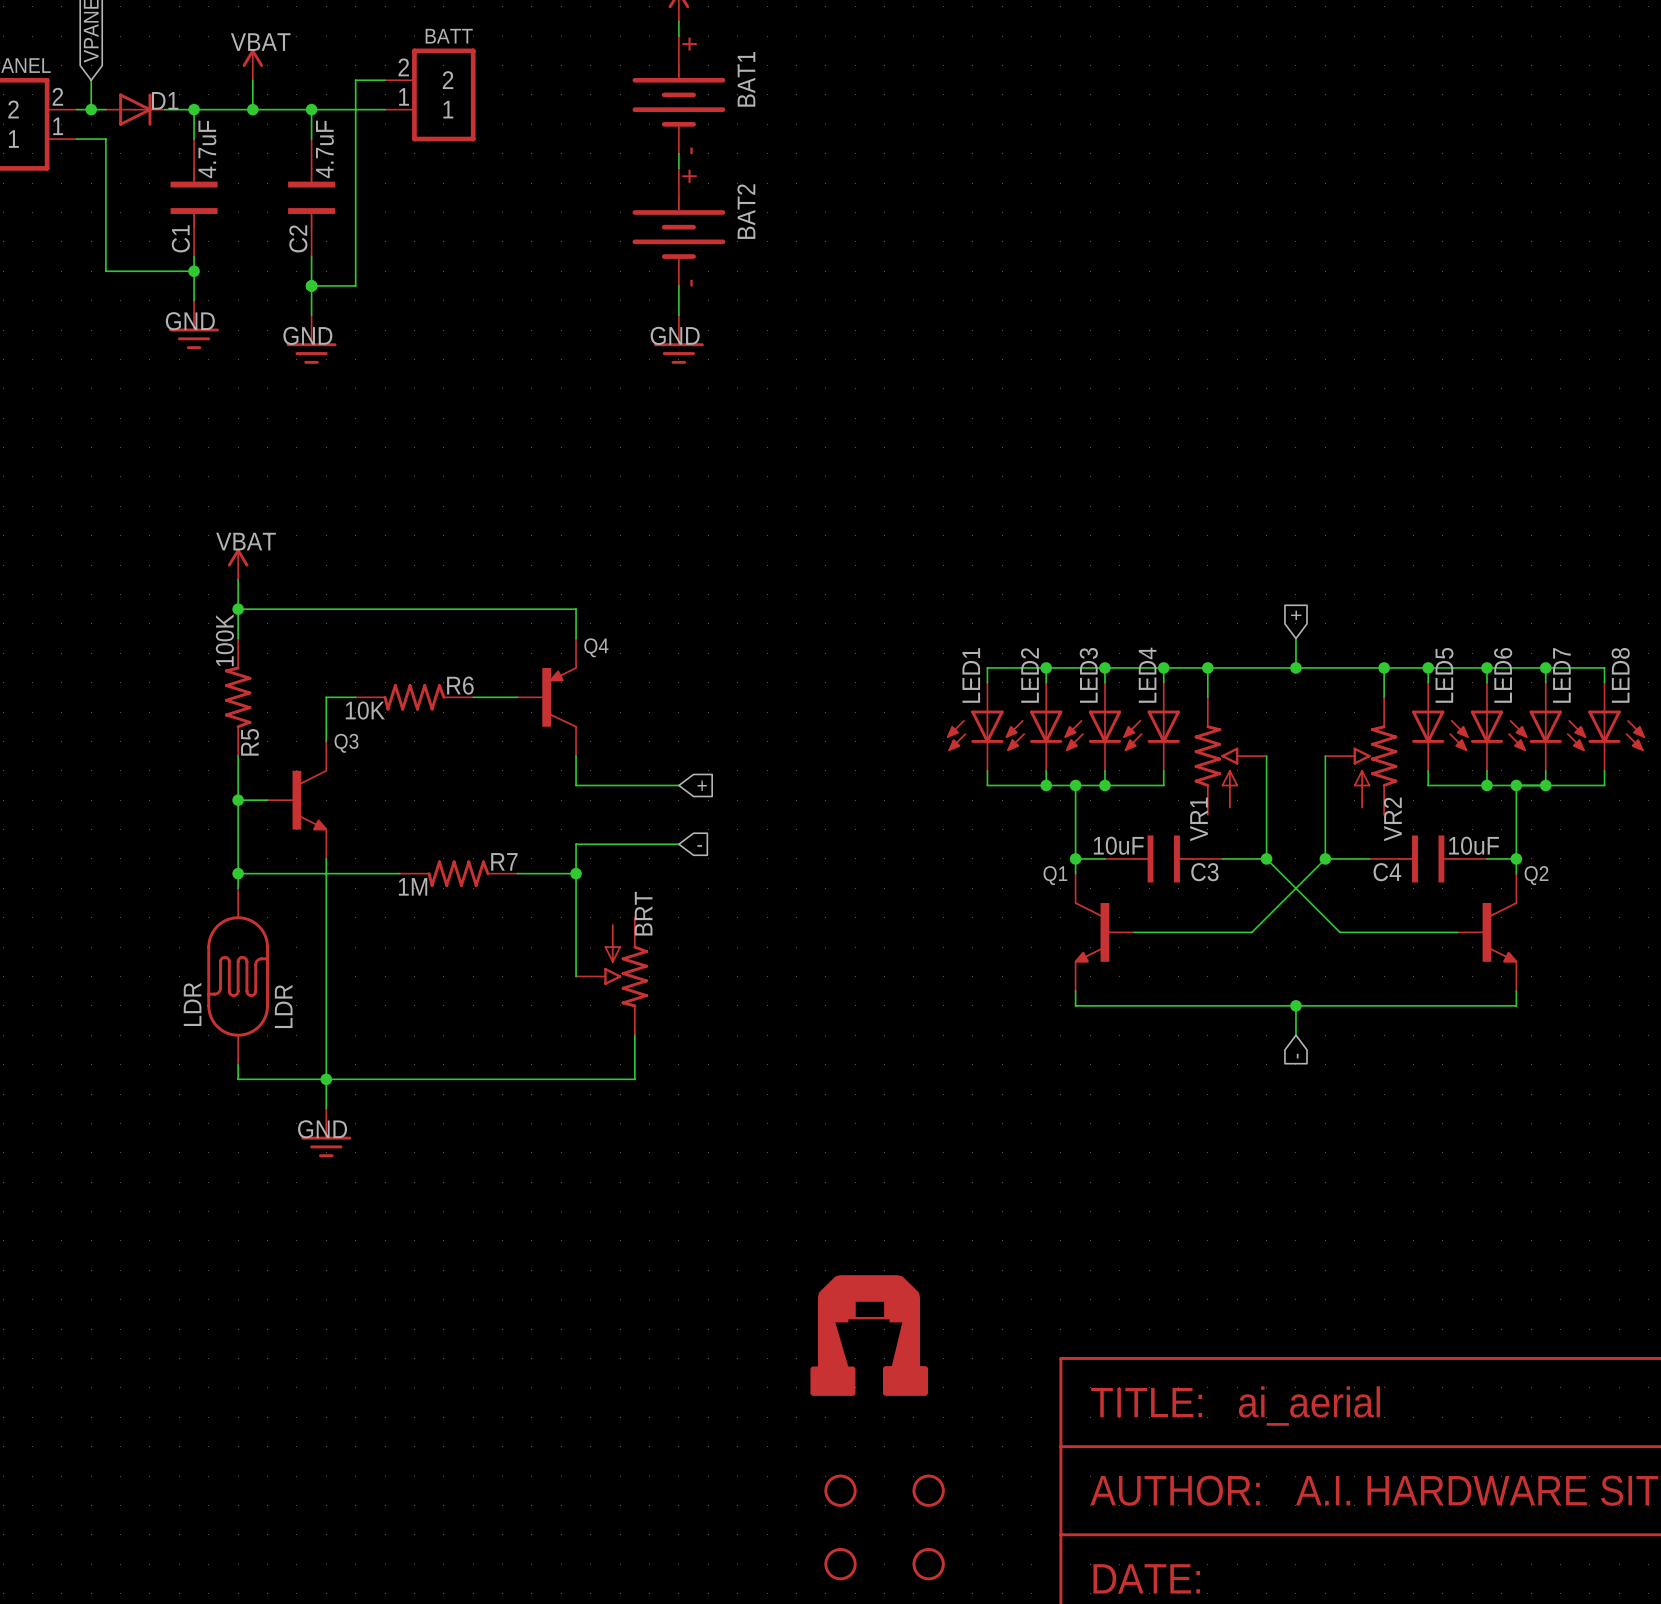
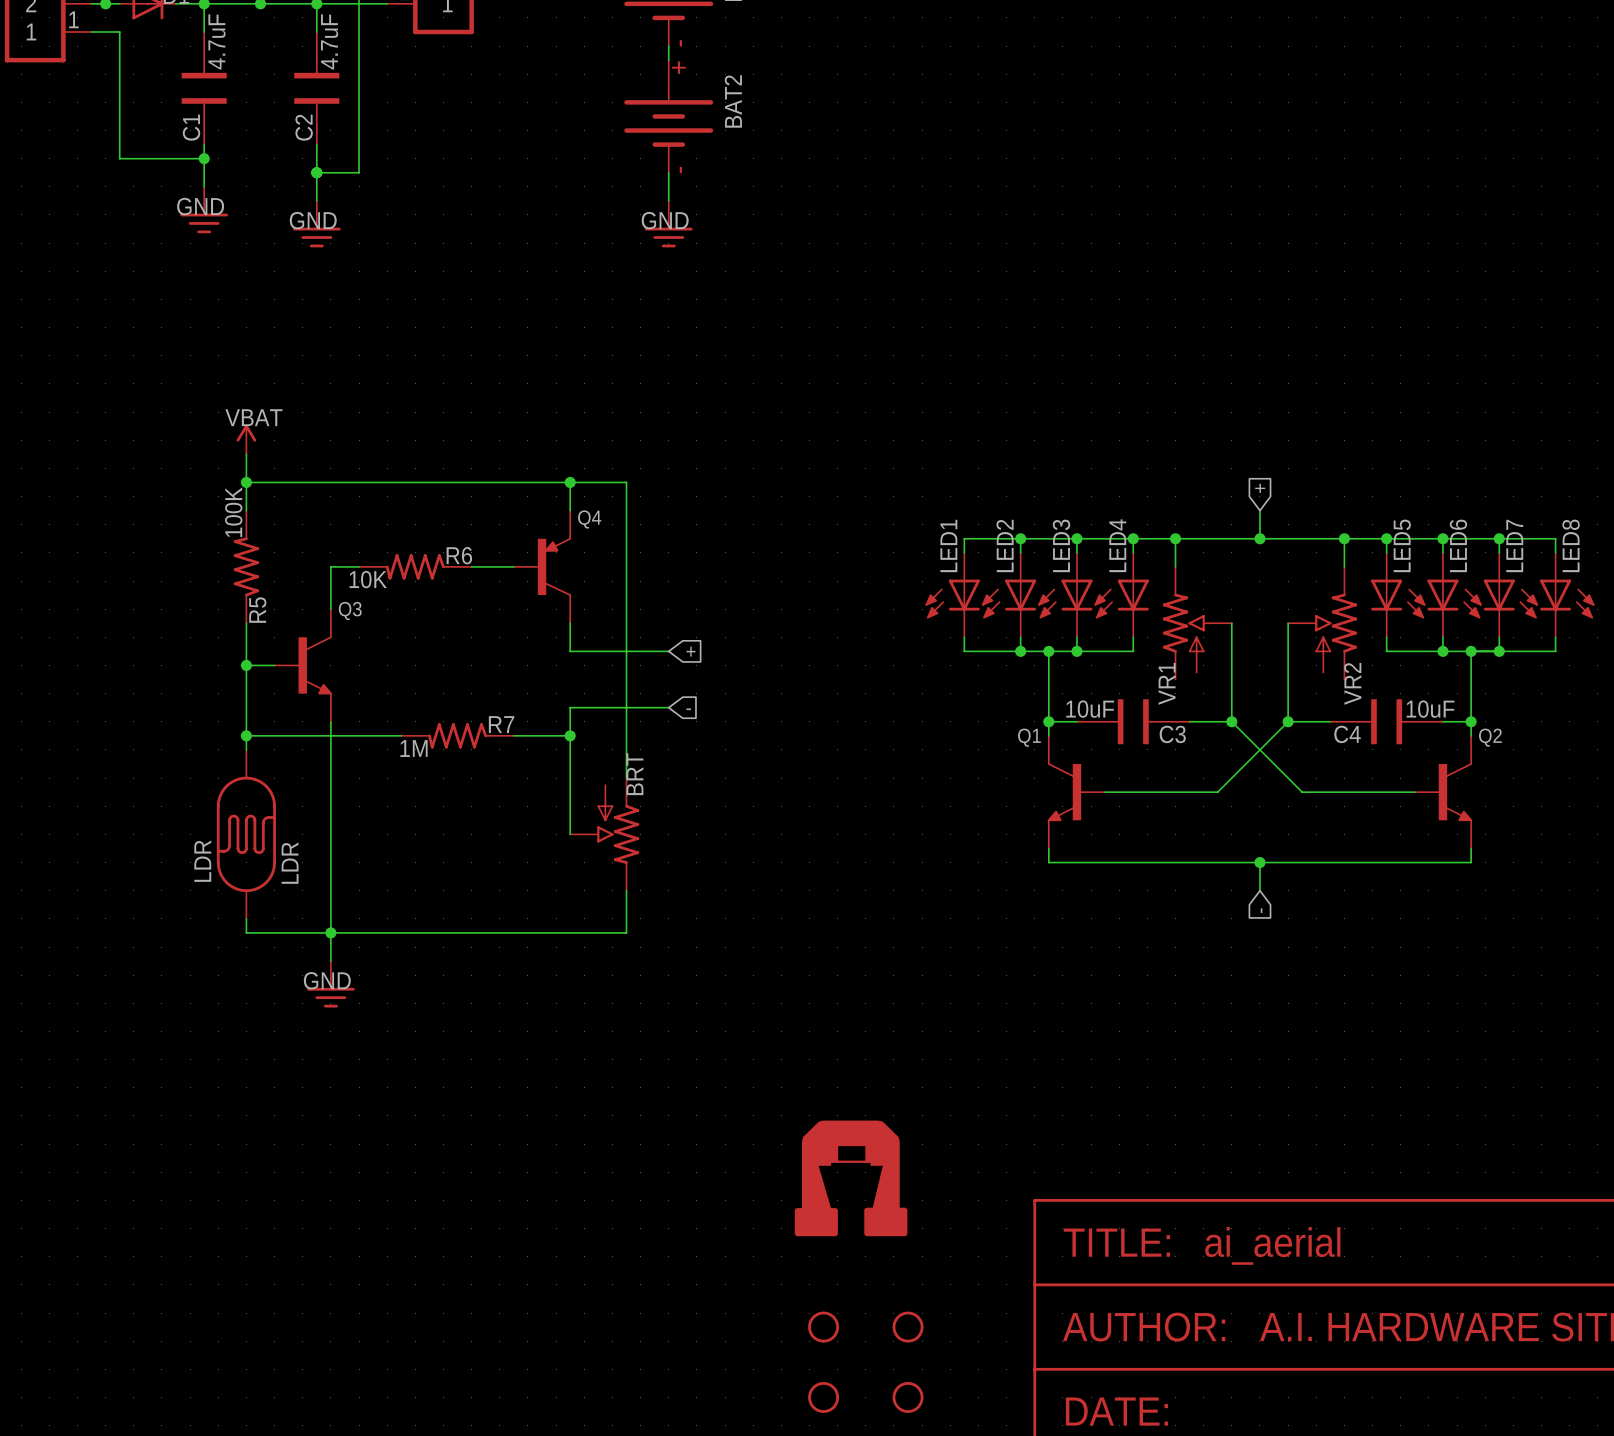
wire: none -> (570, 482) (626, 482) (626, 778)
junction: none -> (570, 482)

